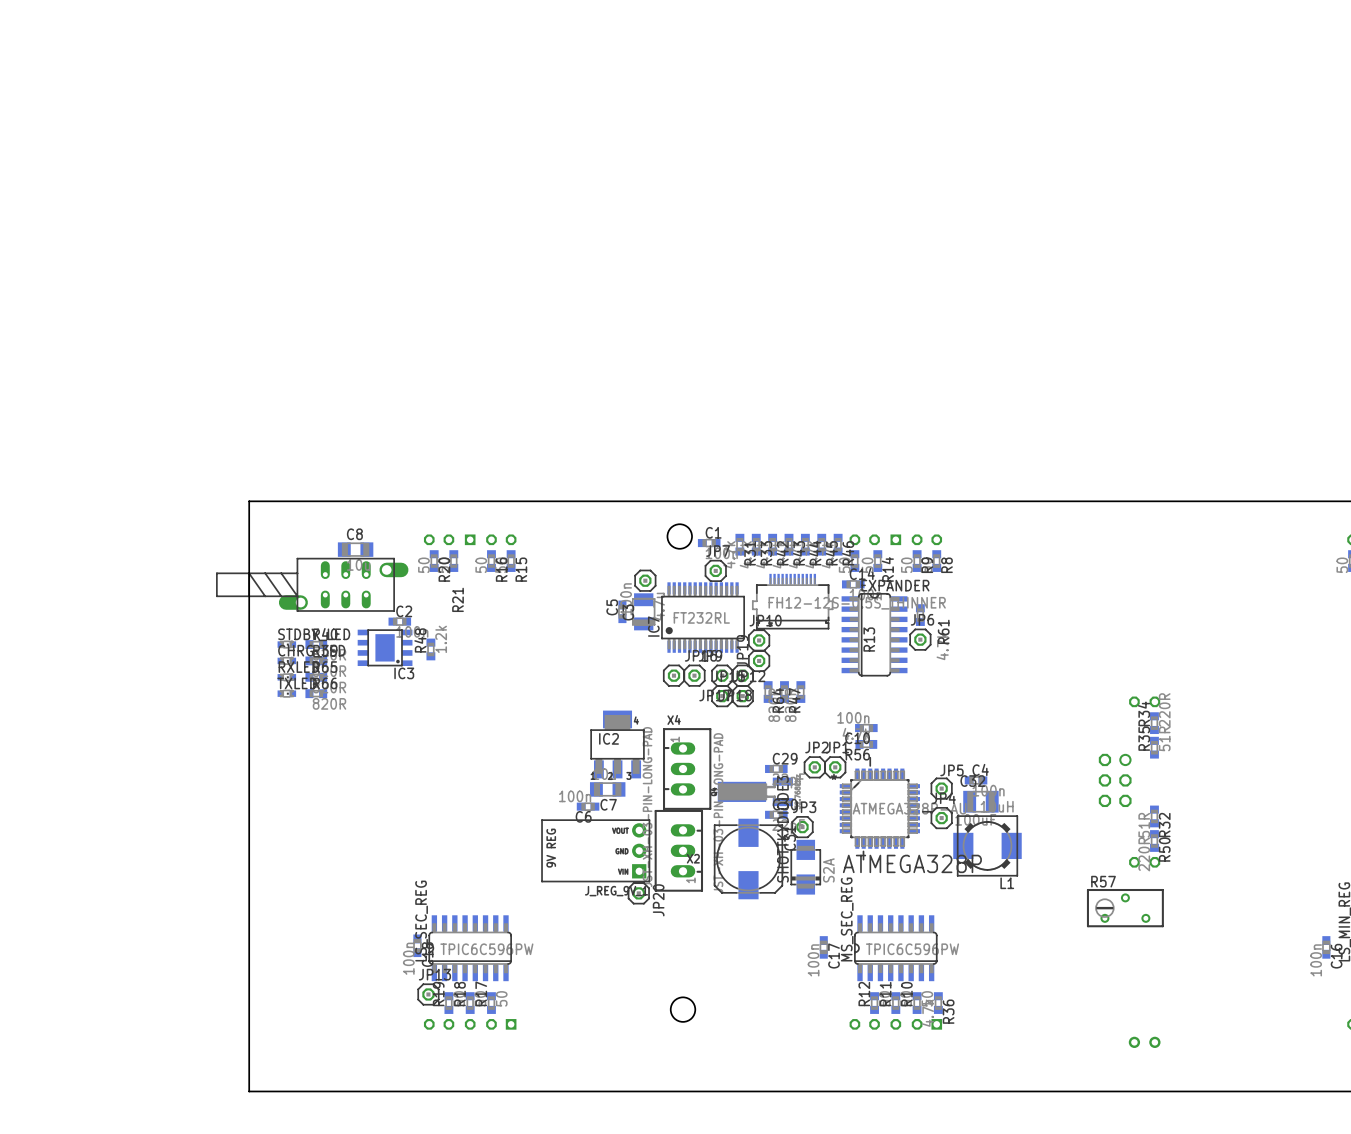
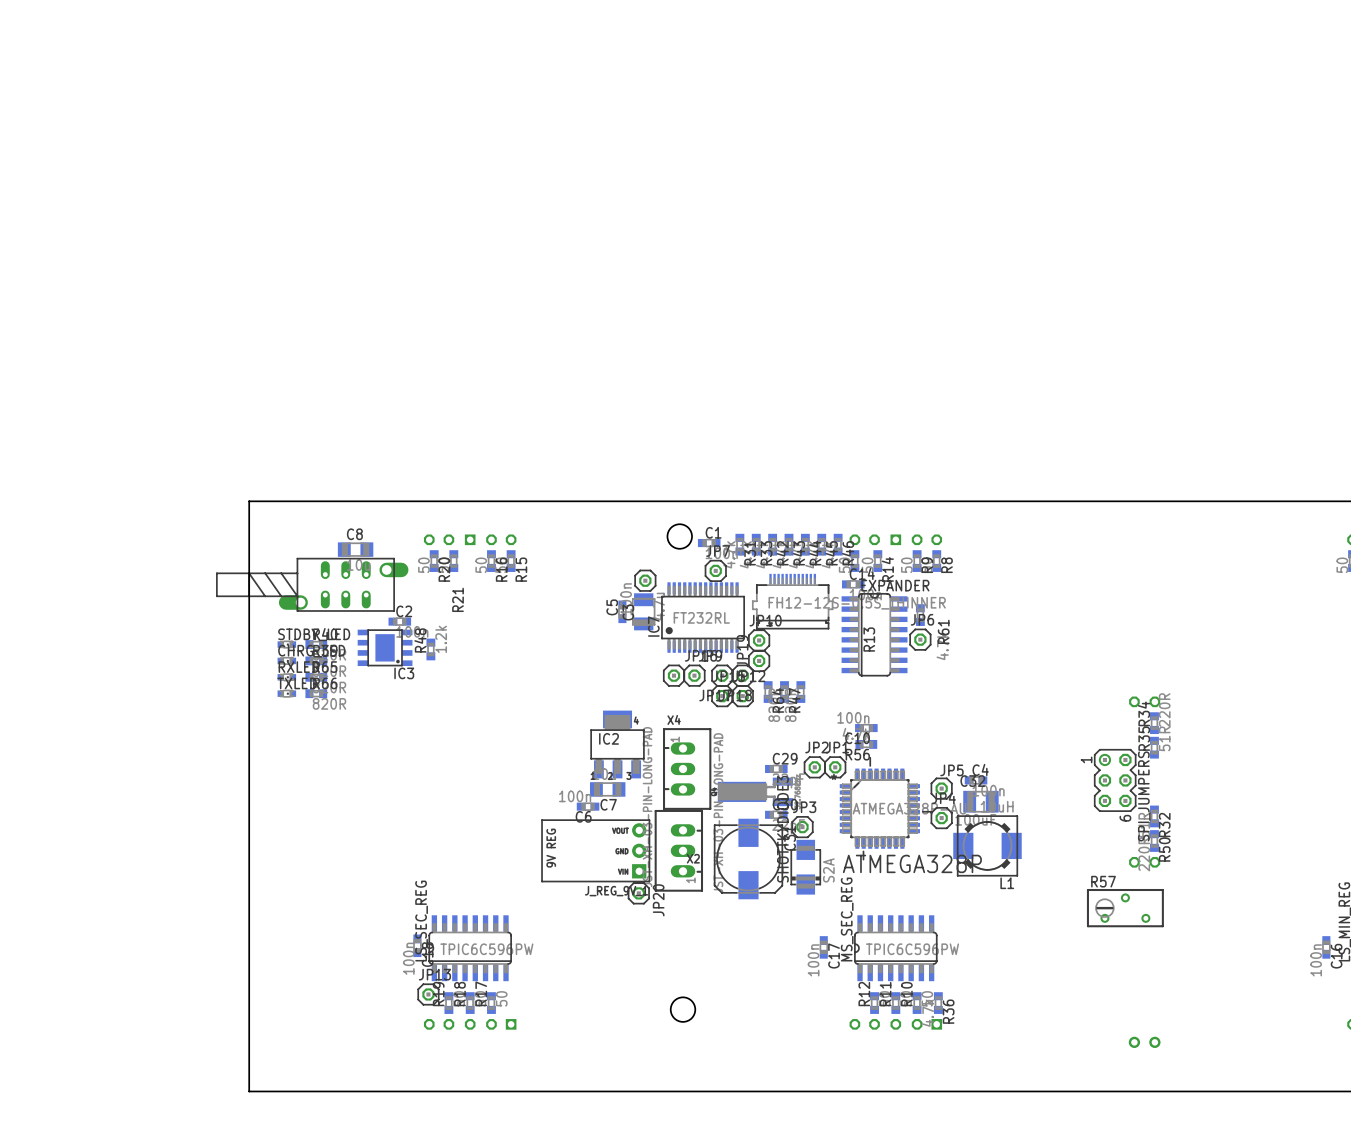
SPI_JUMPERS side: top (1115, 780) -> bottom (1115, 780)

